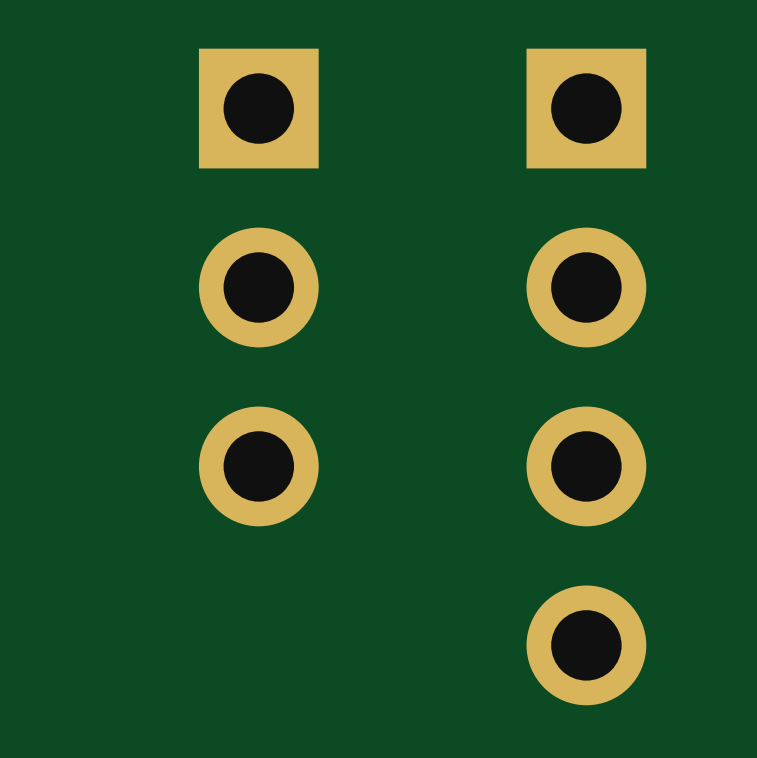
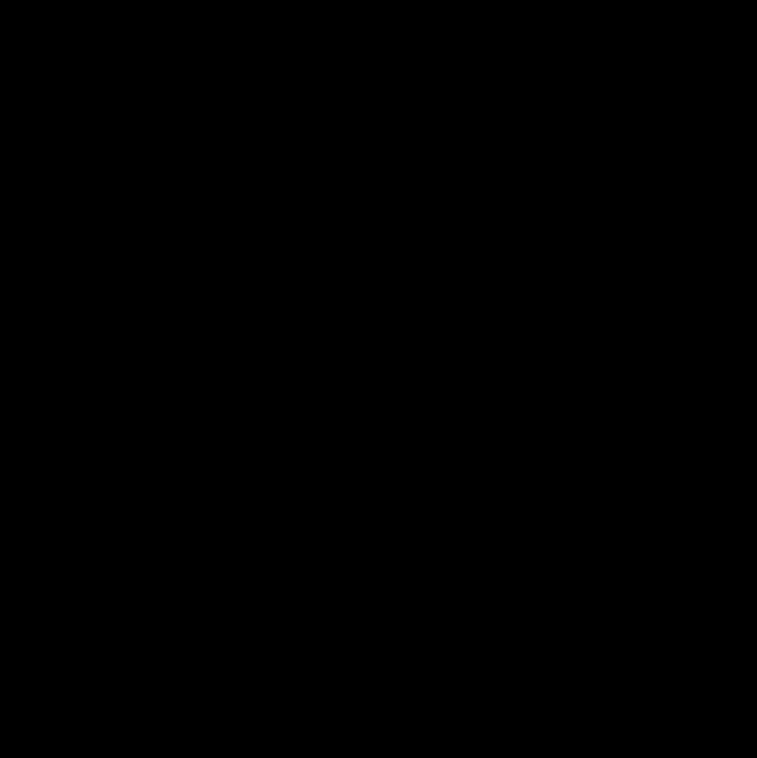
part: (258, 287) -> none
part: (586, 376) -> none

